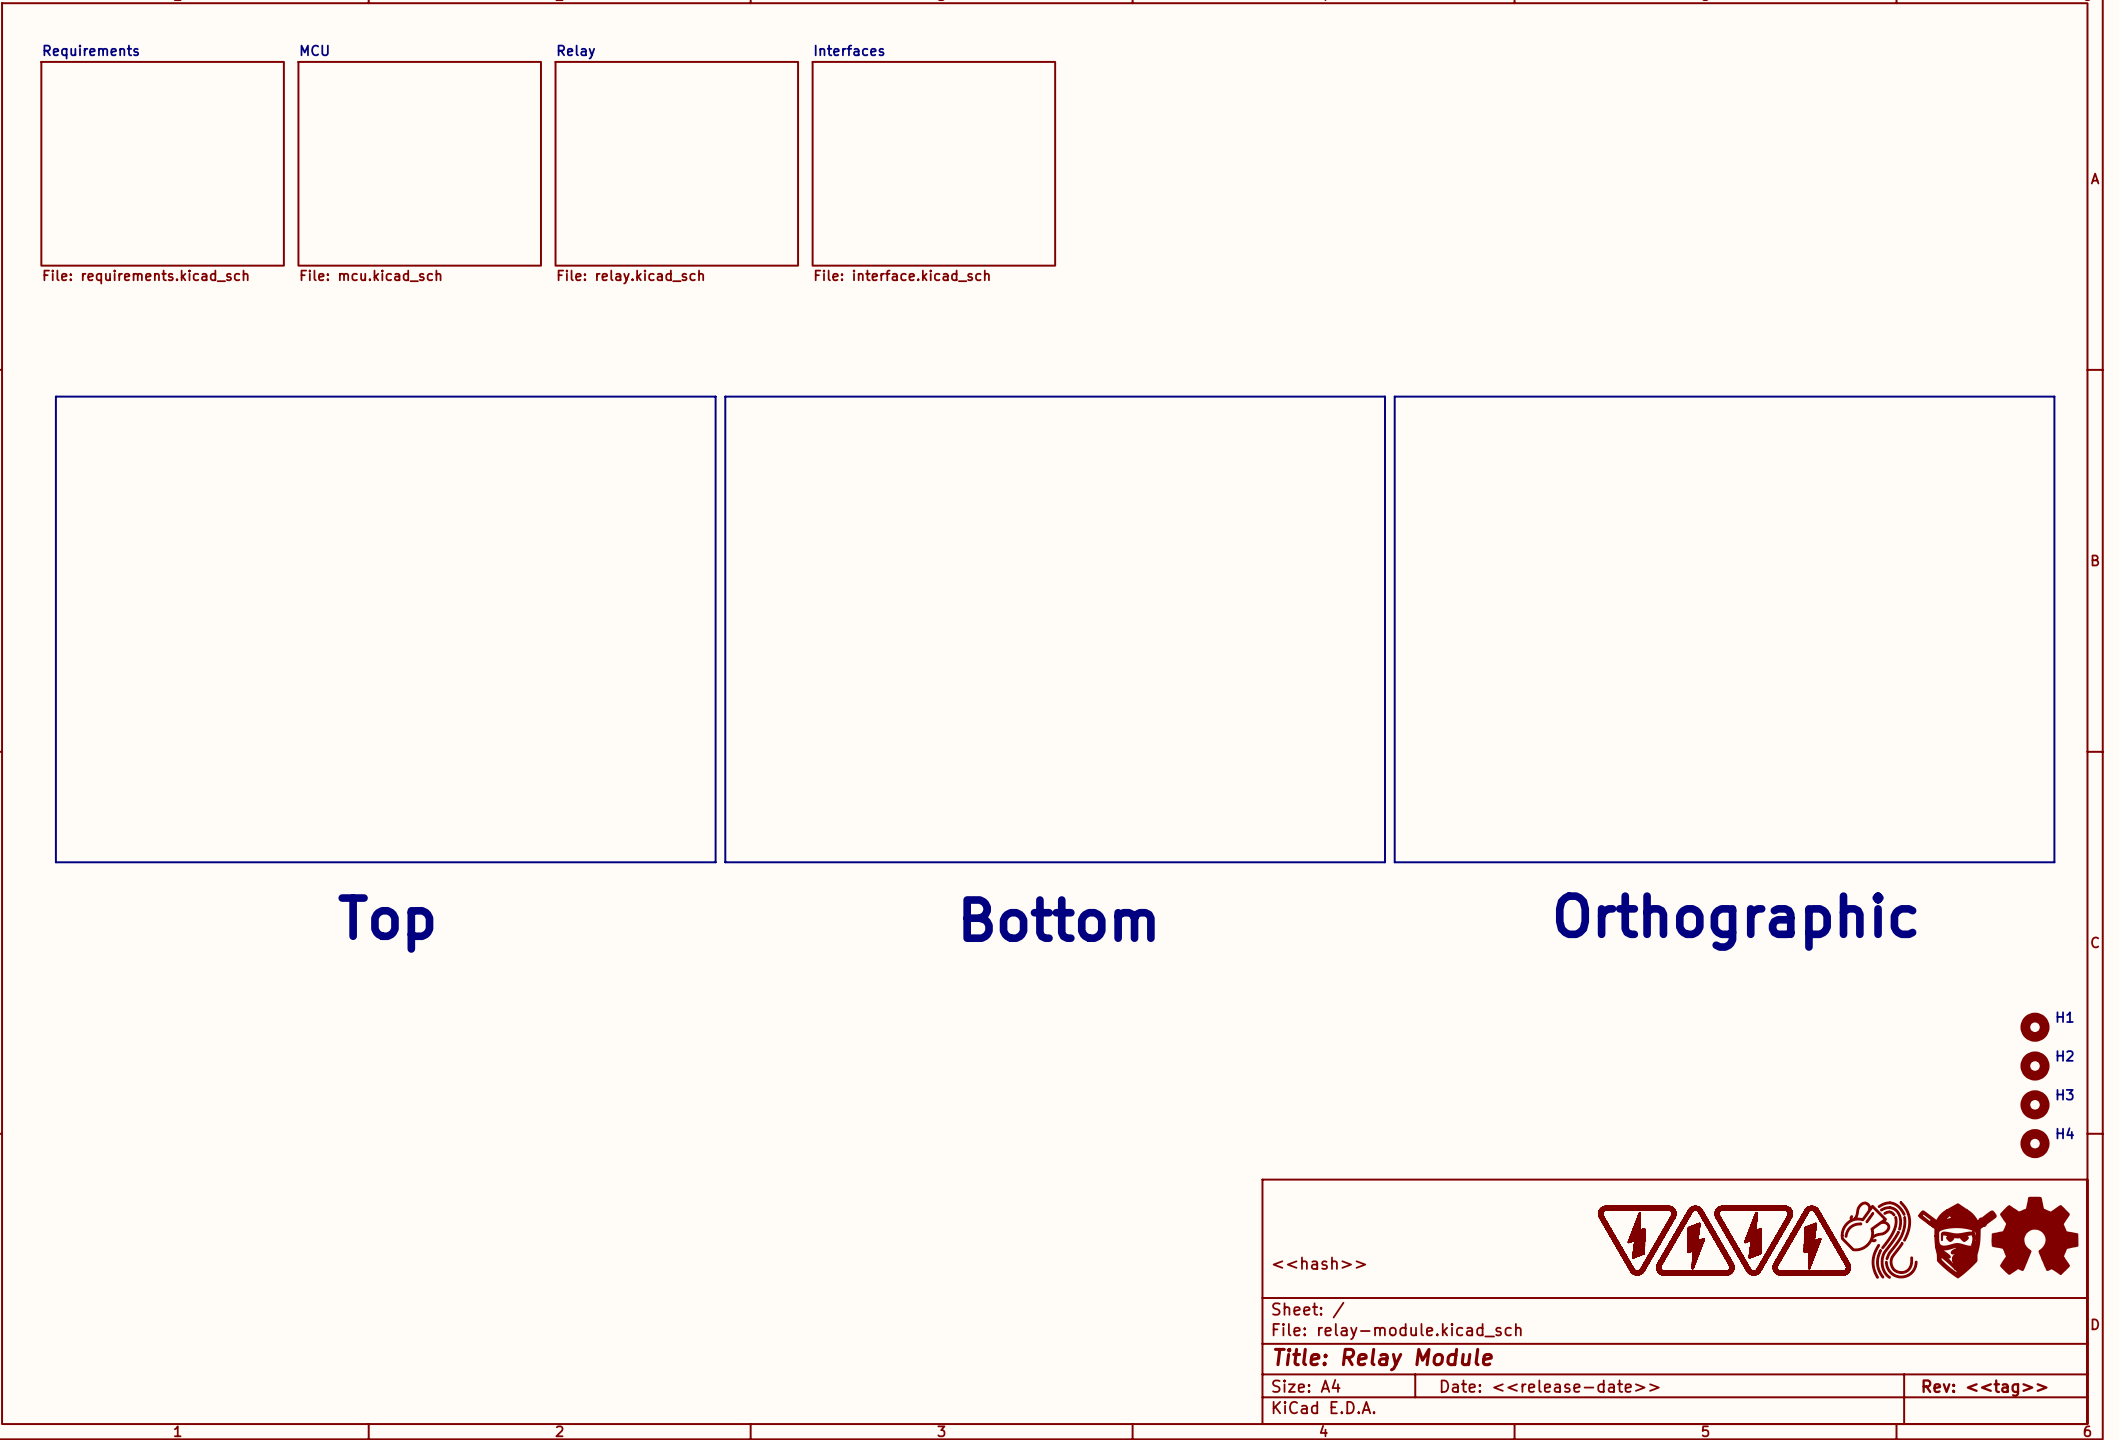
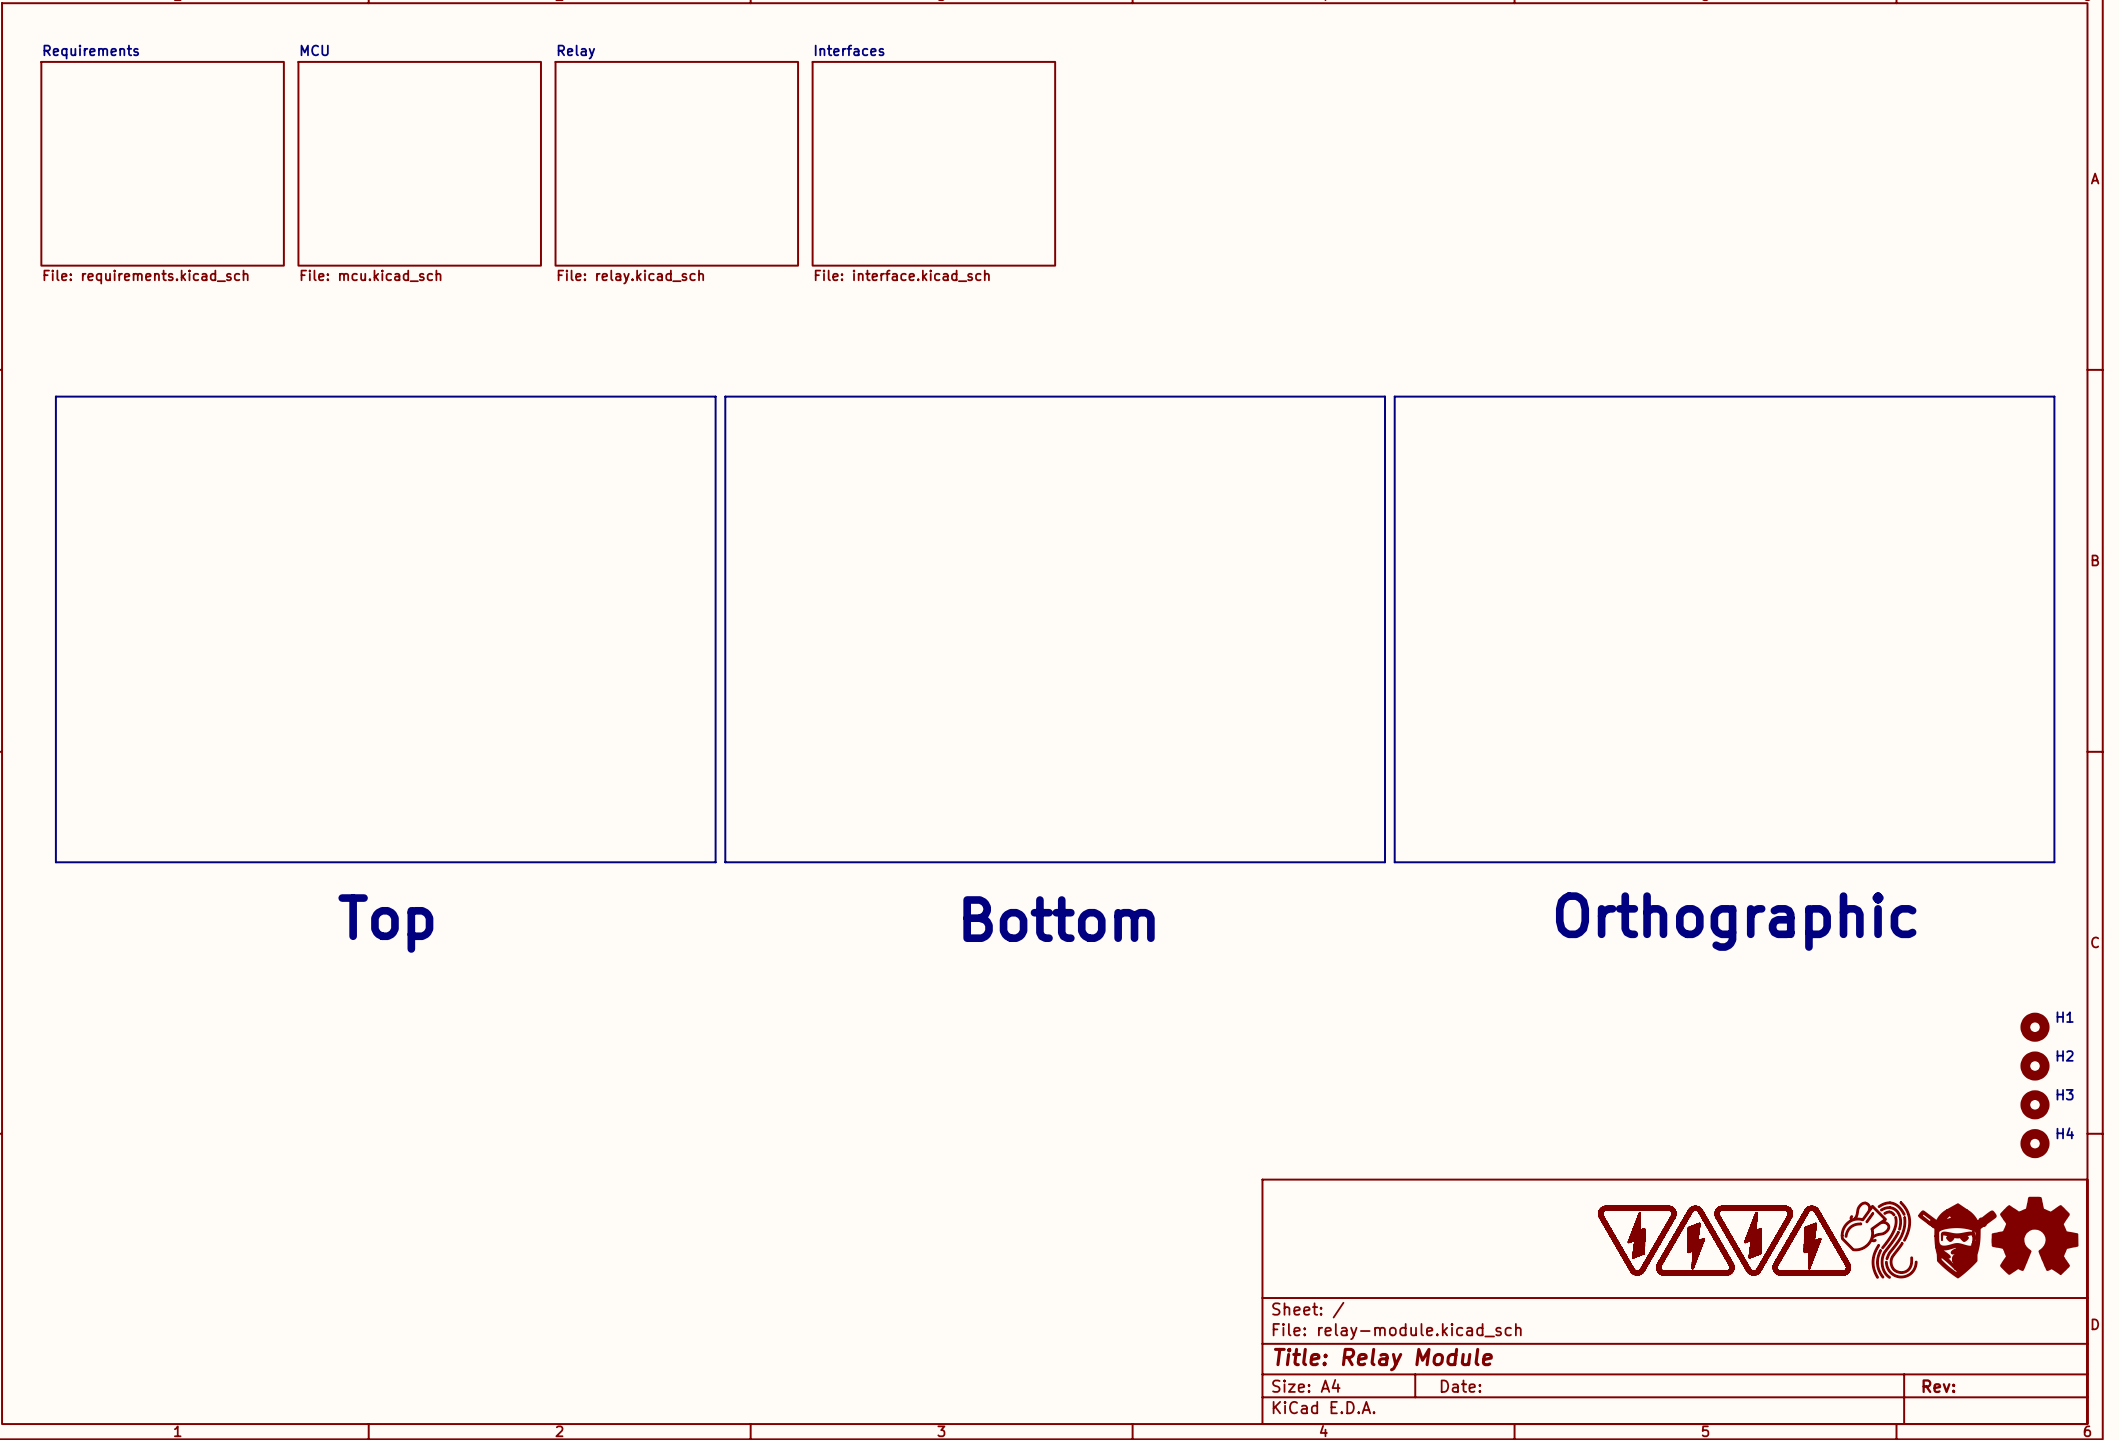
title block: <<hash>> (1319, 1263) -> none
title block: Date: <<release-date>> (1550, 1386) -> Date: (1461, 1386)
title block: Rev: <<tag>> (1985, 1388) -> Rev: (1938, 1386)

